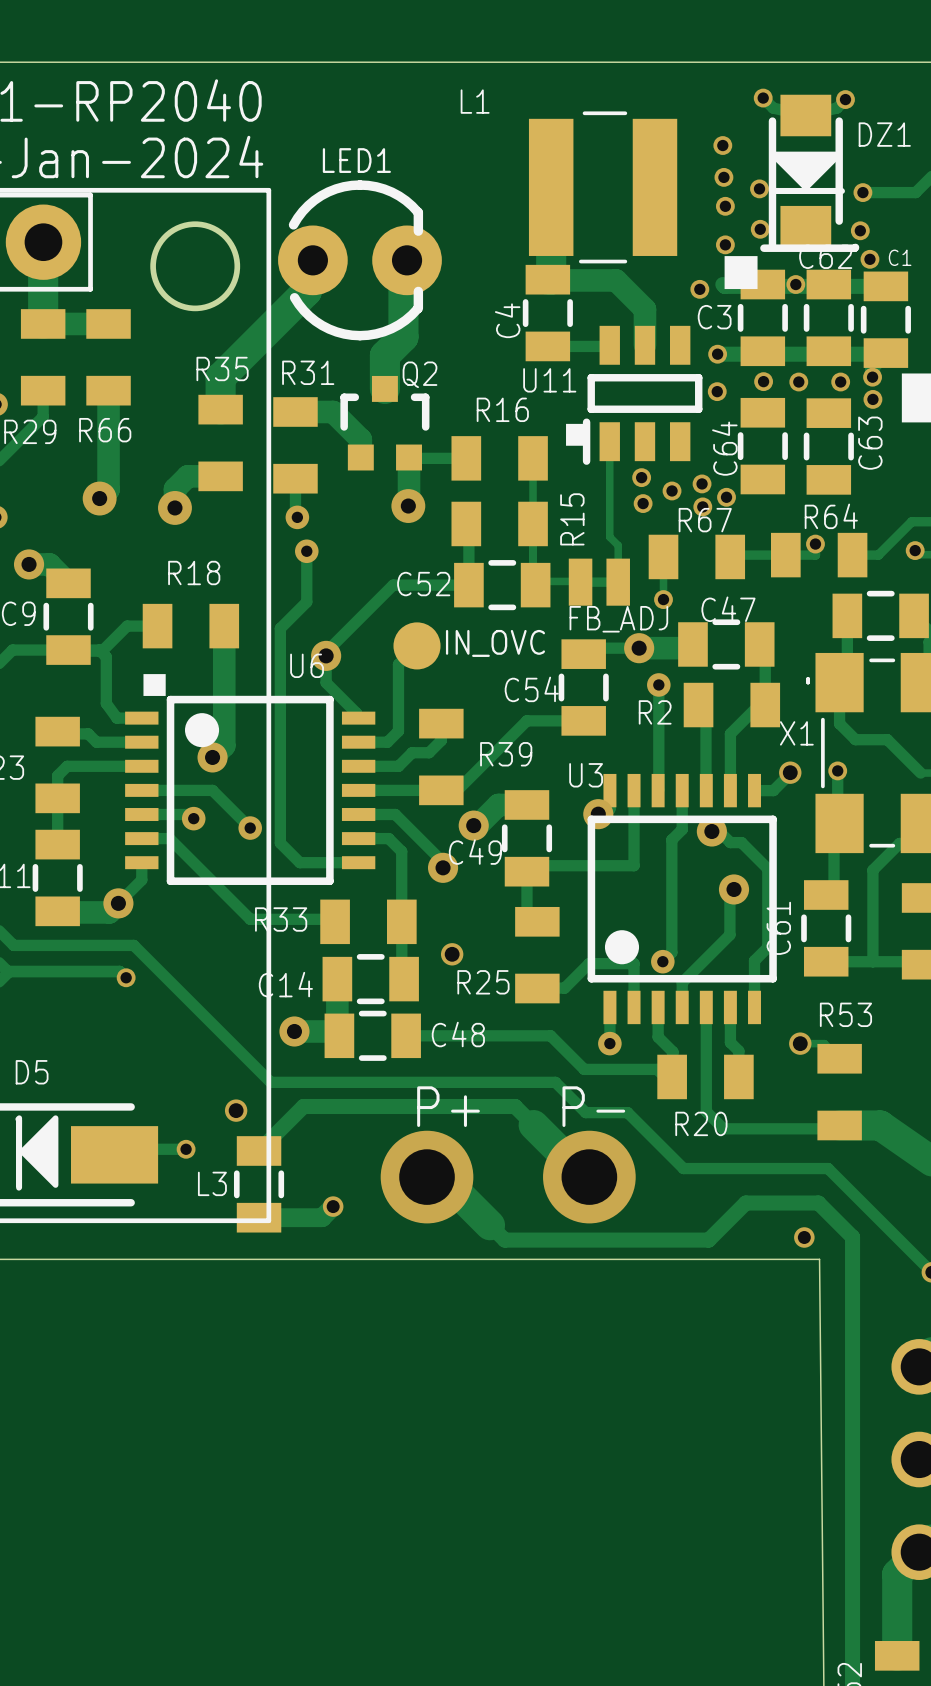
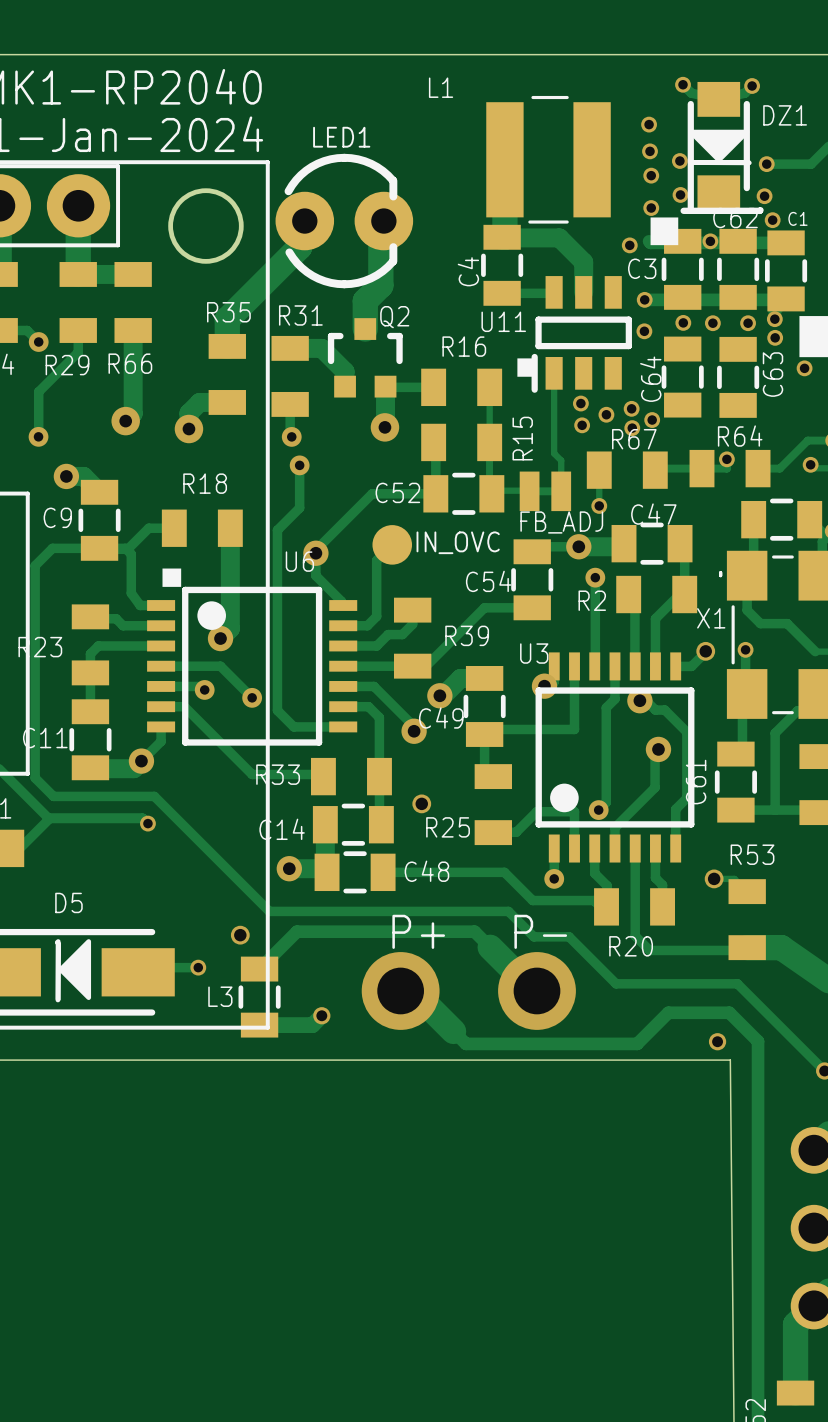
via: none -> (804, 368)

